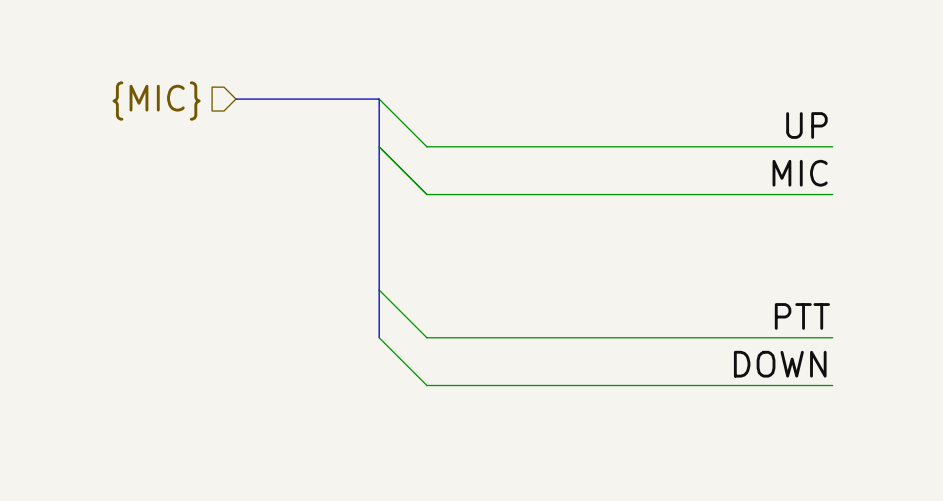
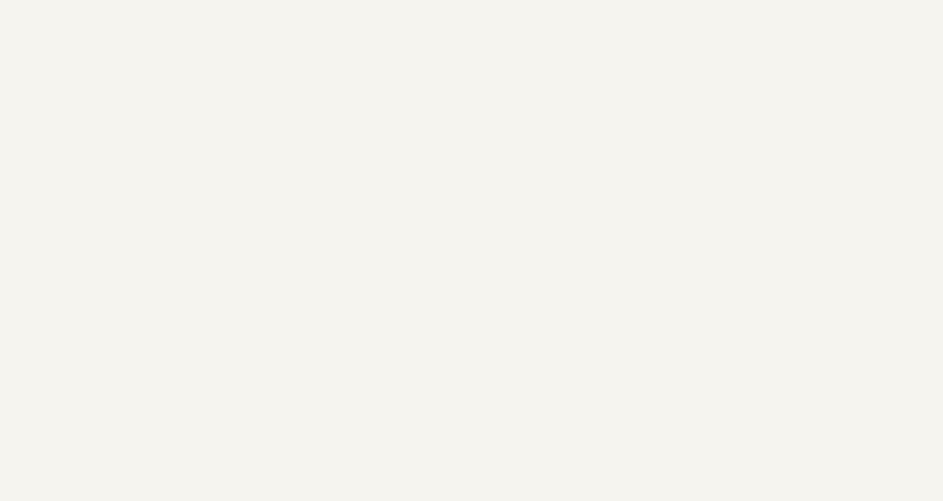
bus: (235, 99) (379, 99) (379, 337) -> none
wire: (379, 99) (426, 146) (832, 146) -> none
hierarchical label: {MIC} (156, 101) -> none
label: UP (806, 125) -> none
wire: (379, 146) (426, 194) (832, 194) -> none
label: MIC (800, 173) -> none
wire: (379, 290) (426, 337) (832, 337) -> none
label: PTT (802, 316) -> none
wire: (379, 337) (426, 385) (832, 385) -> none
label: DOWN (780, 364) -> none

